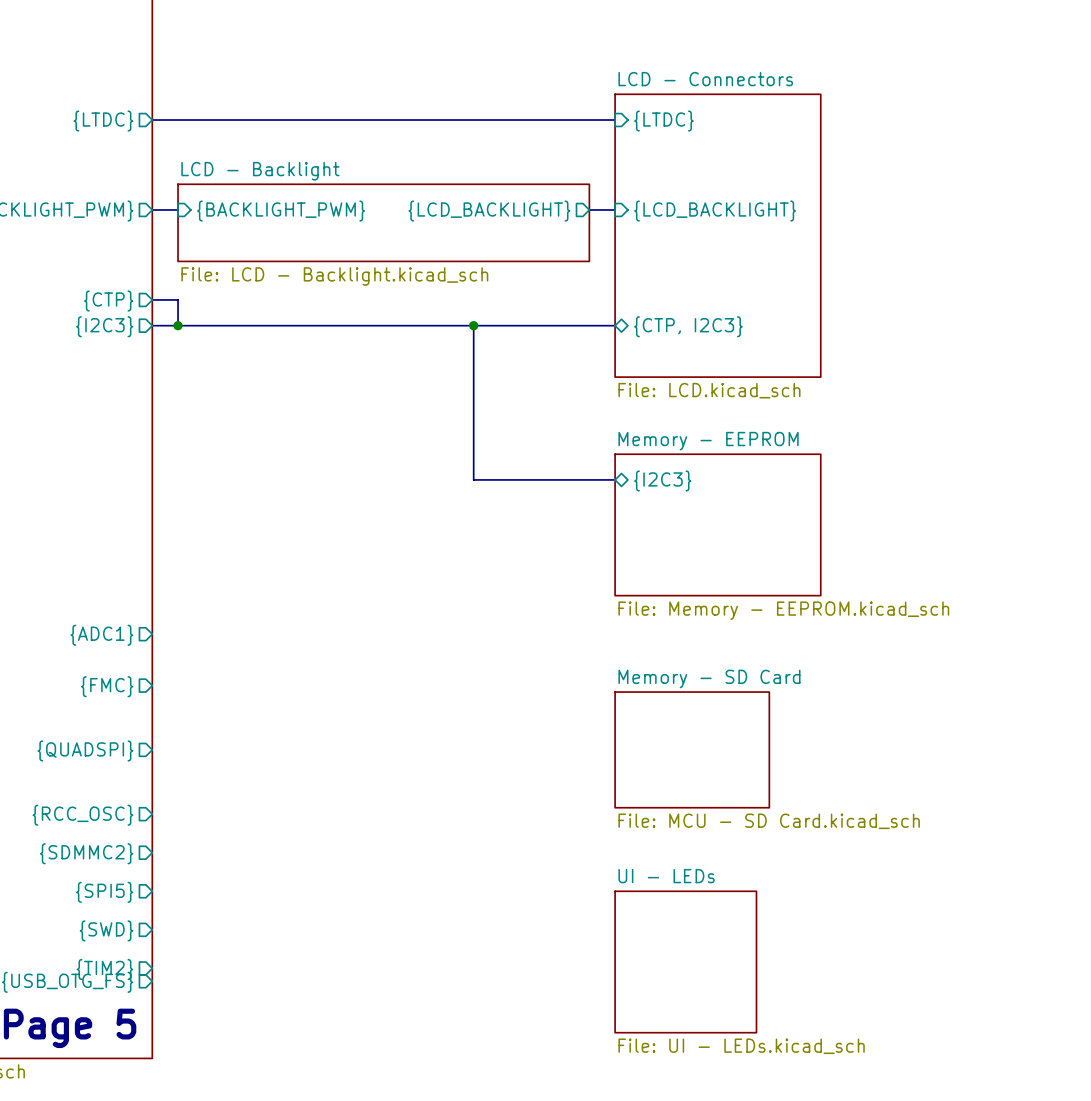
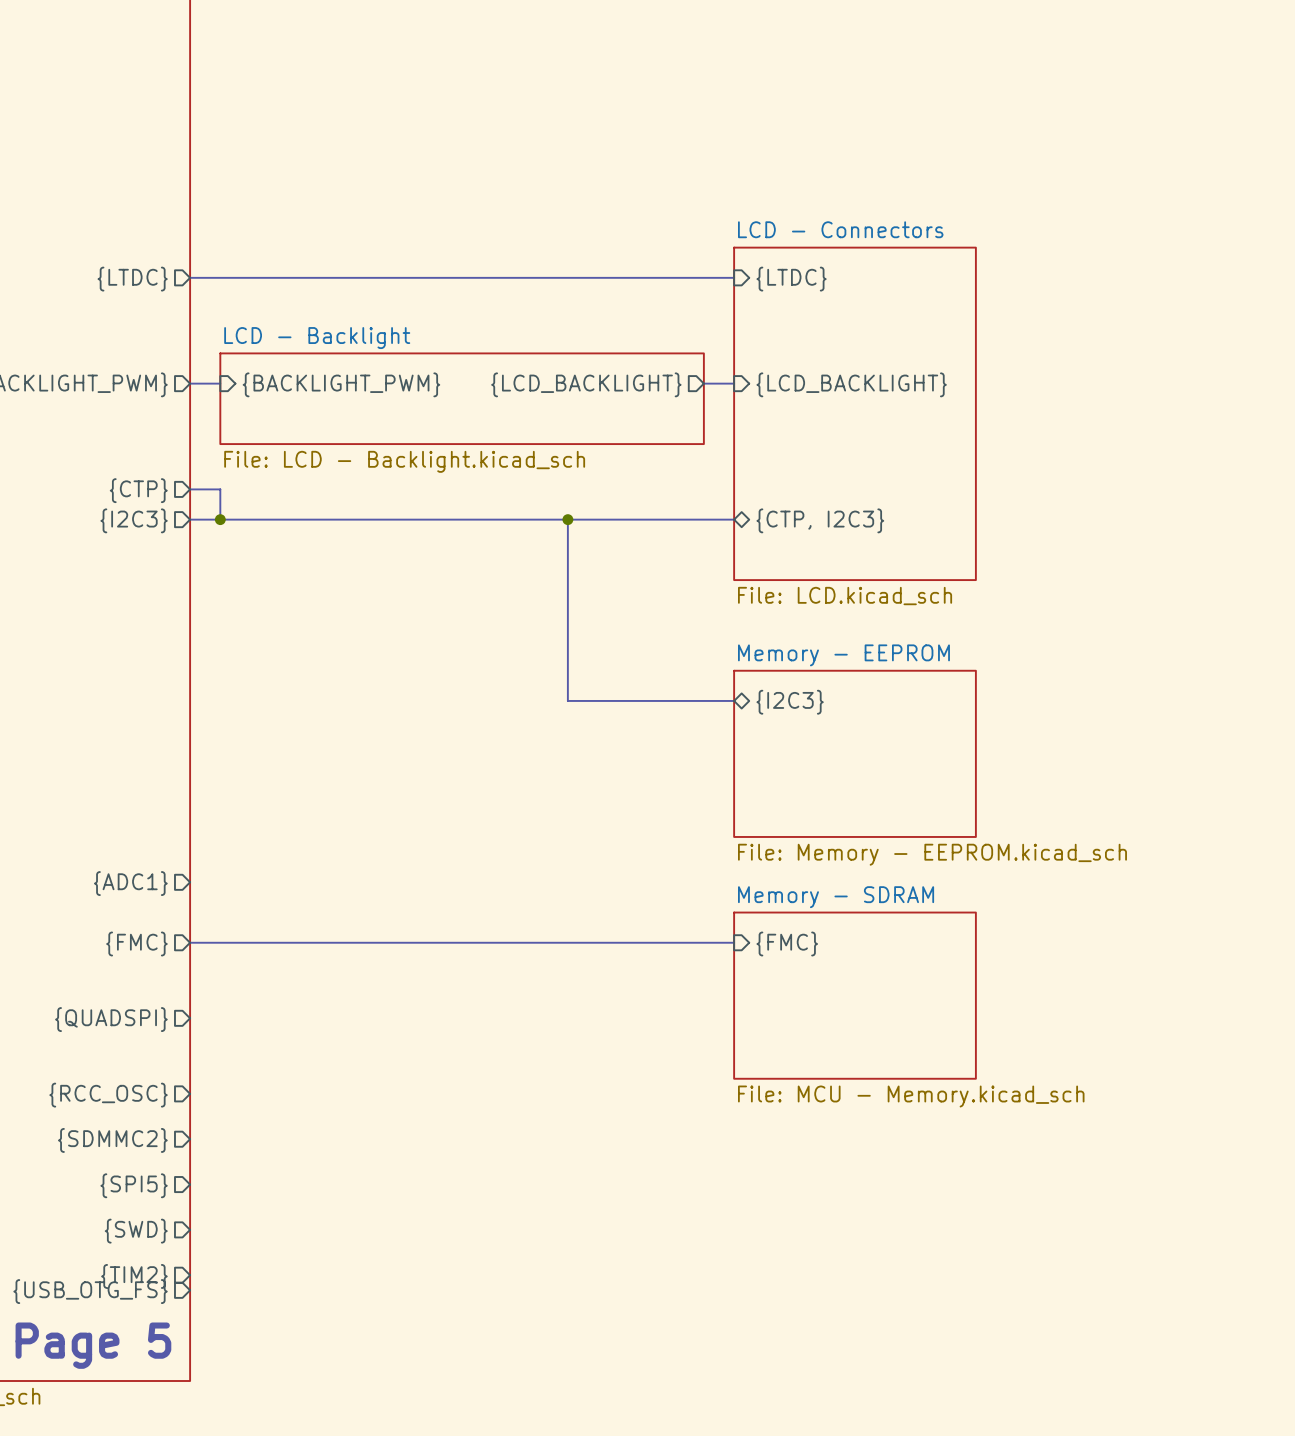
bus: none -> (190, 942) (734, 942)
sheet pin: none -> {FMC} (787, 943)
sheet Memory - SDRAM: none -> File: MCU - Memory.kicad_sch (855, 995)
sheet Memory - SD Card: File: MCU - SD Card.kicad_sch (692, 749) -> none
sheet UI - LEDs: File: UI - LEDs.kicad_sch (685, 962) -> none

